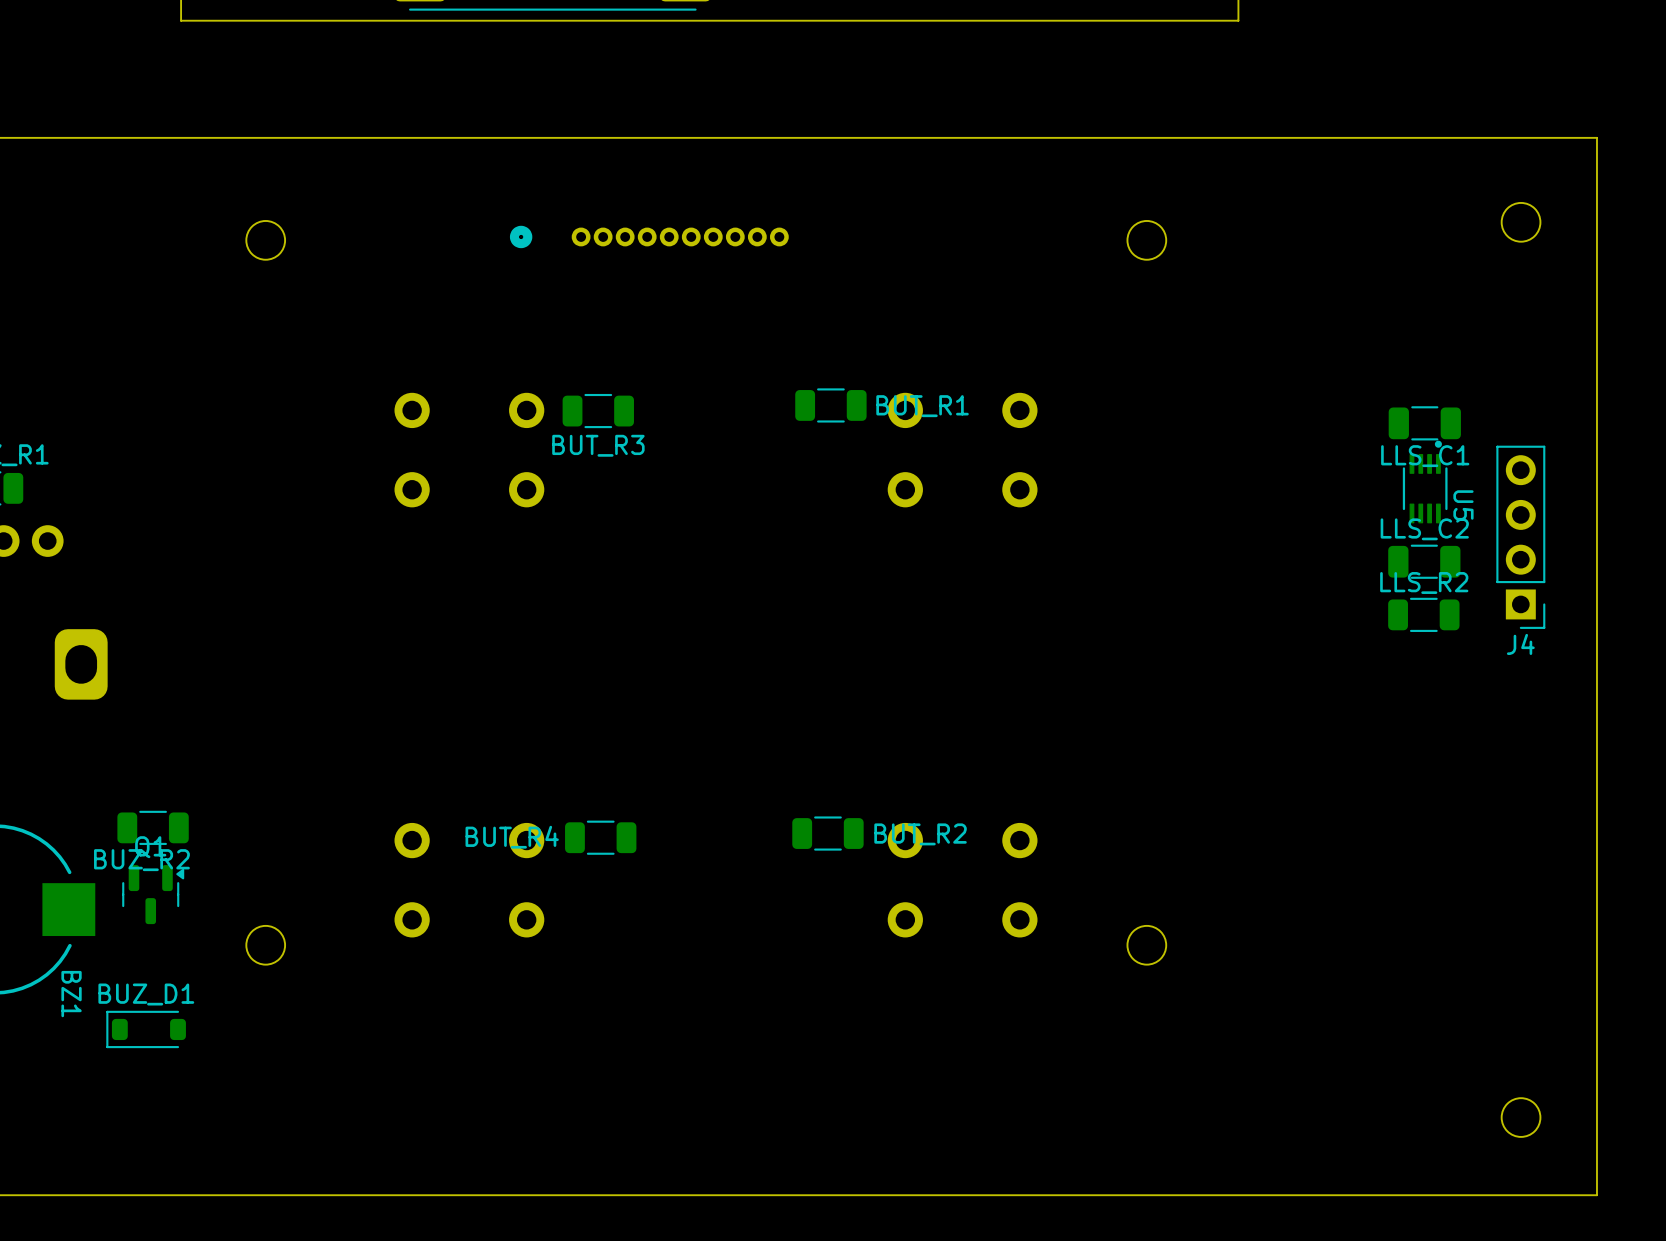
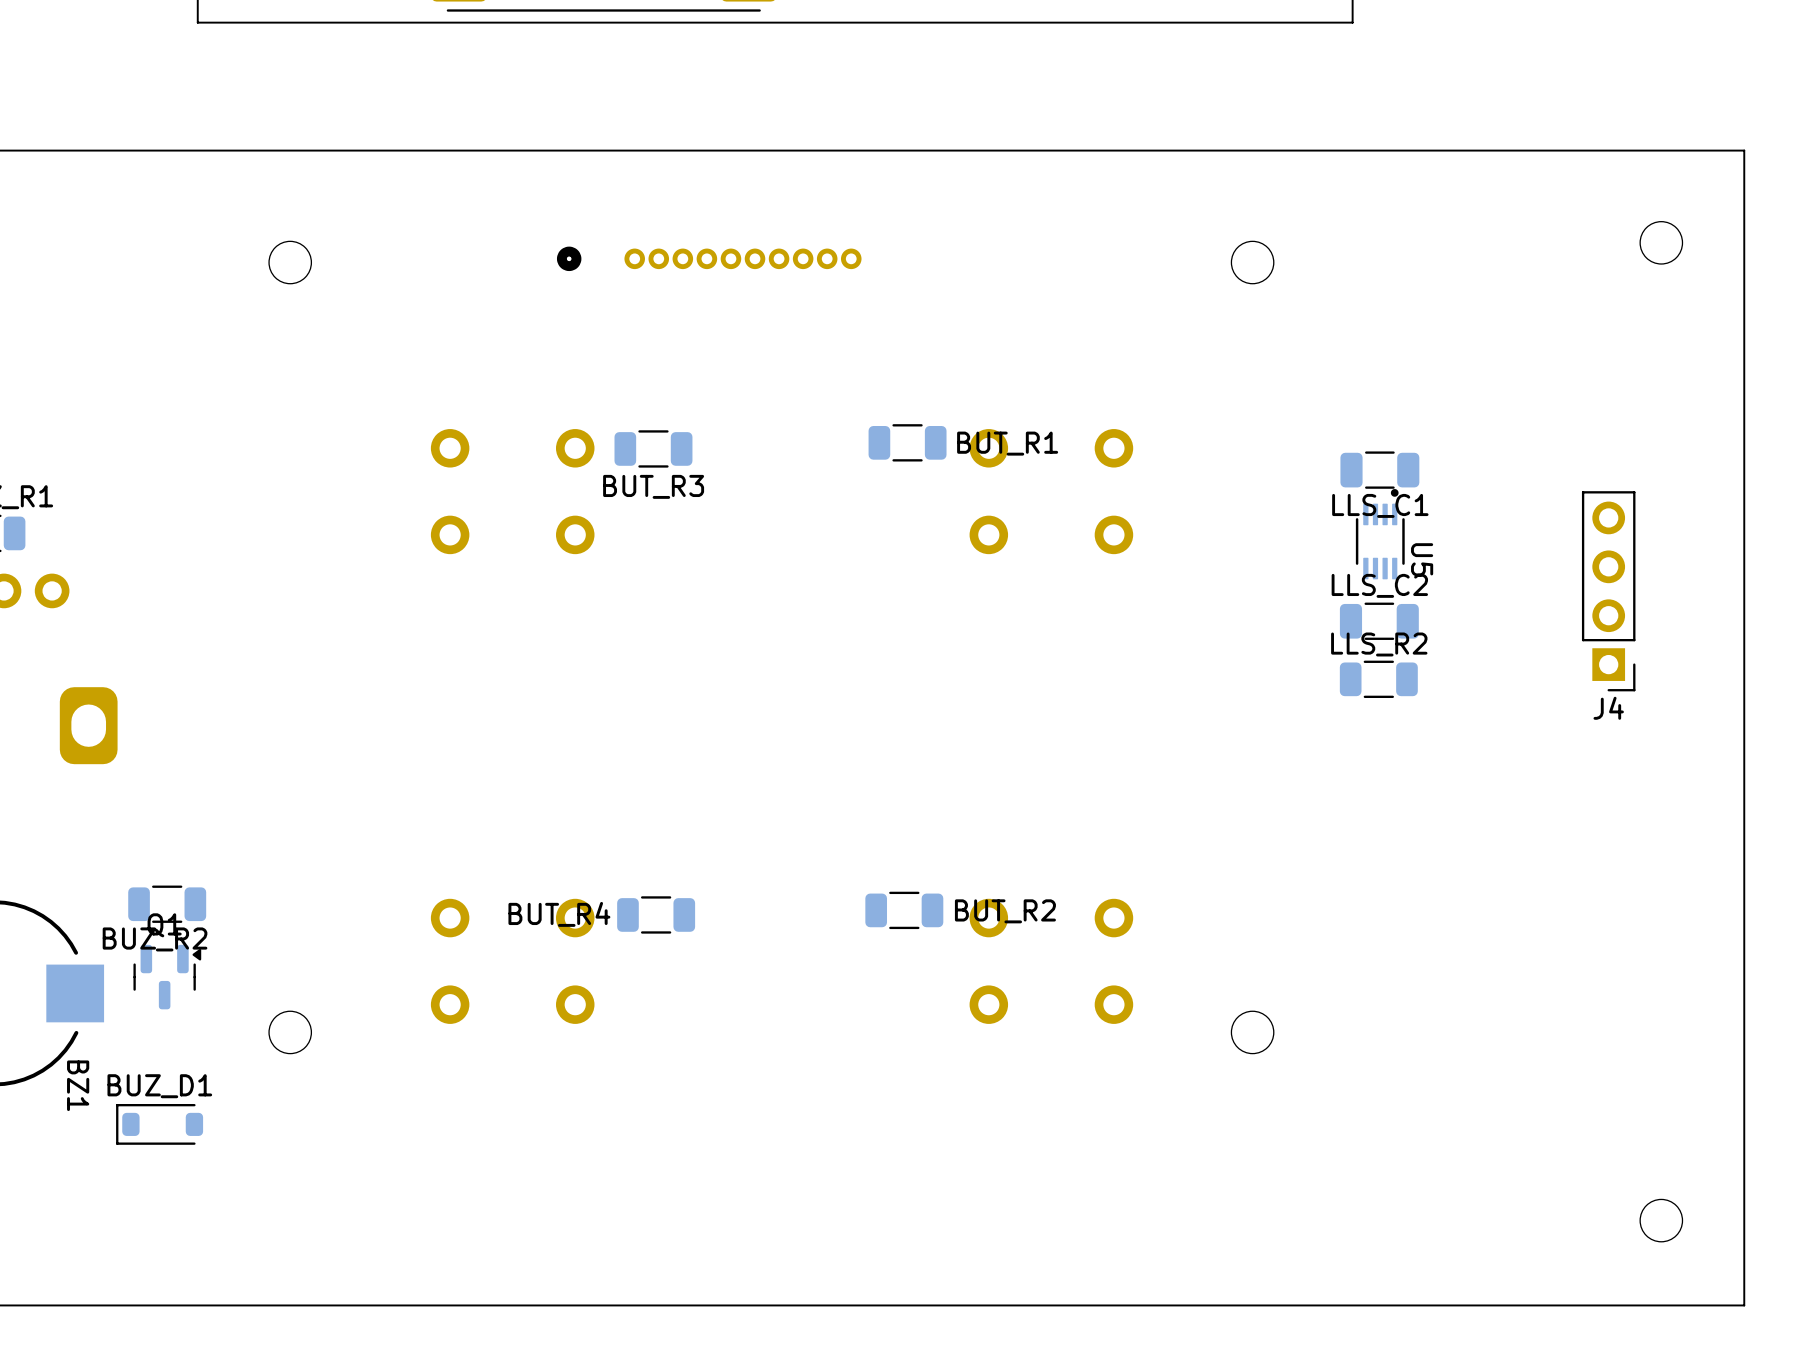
LLS_C1 position: (1424, 423) -> (1379, 470)
U5 position: (1425, 482) -> (1380, 534)
J4 position: (1520, 537) -> (1608, 591)
LLS_C2 position: (1424, 561) -> (1379, 621)
LLS_R2 position: (1423, 614) -> (1378, 679)

